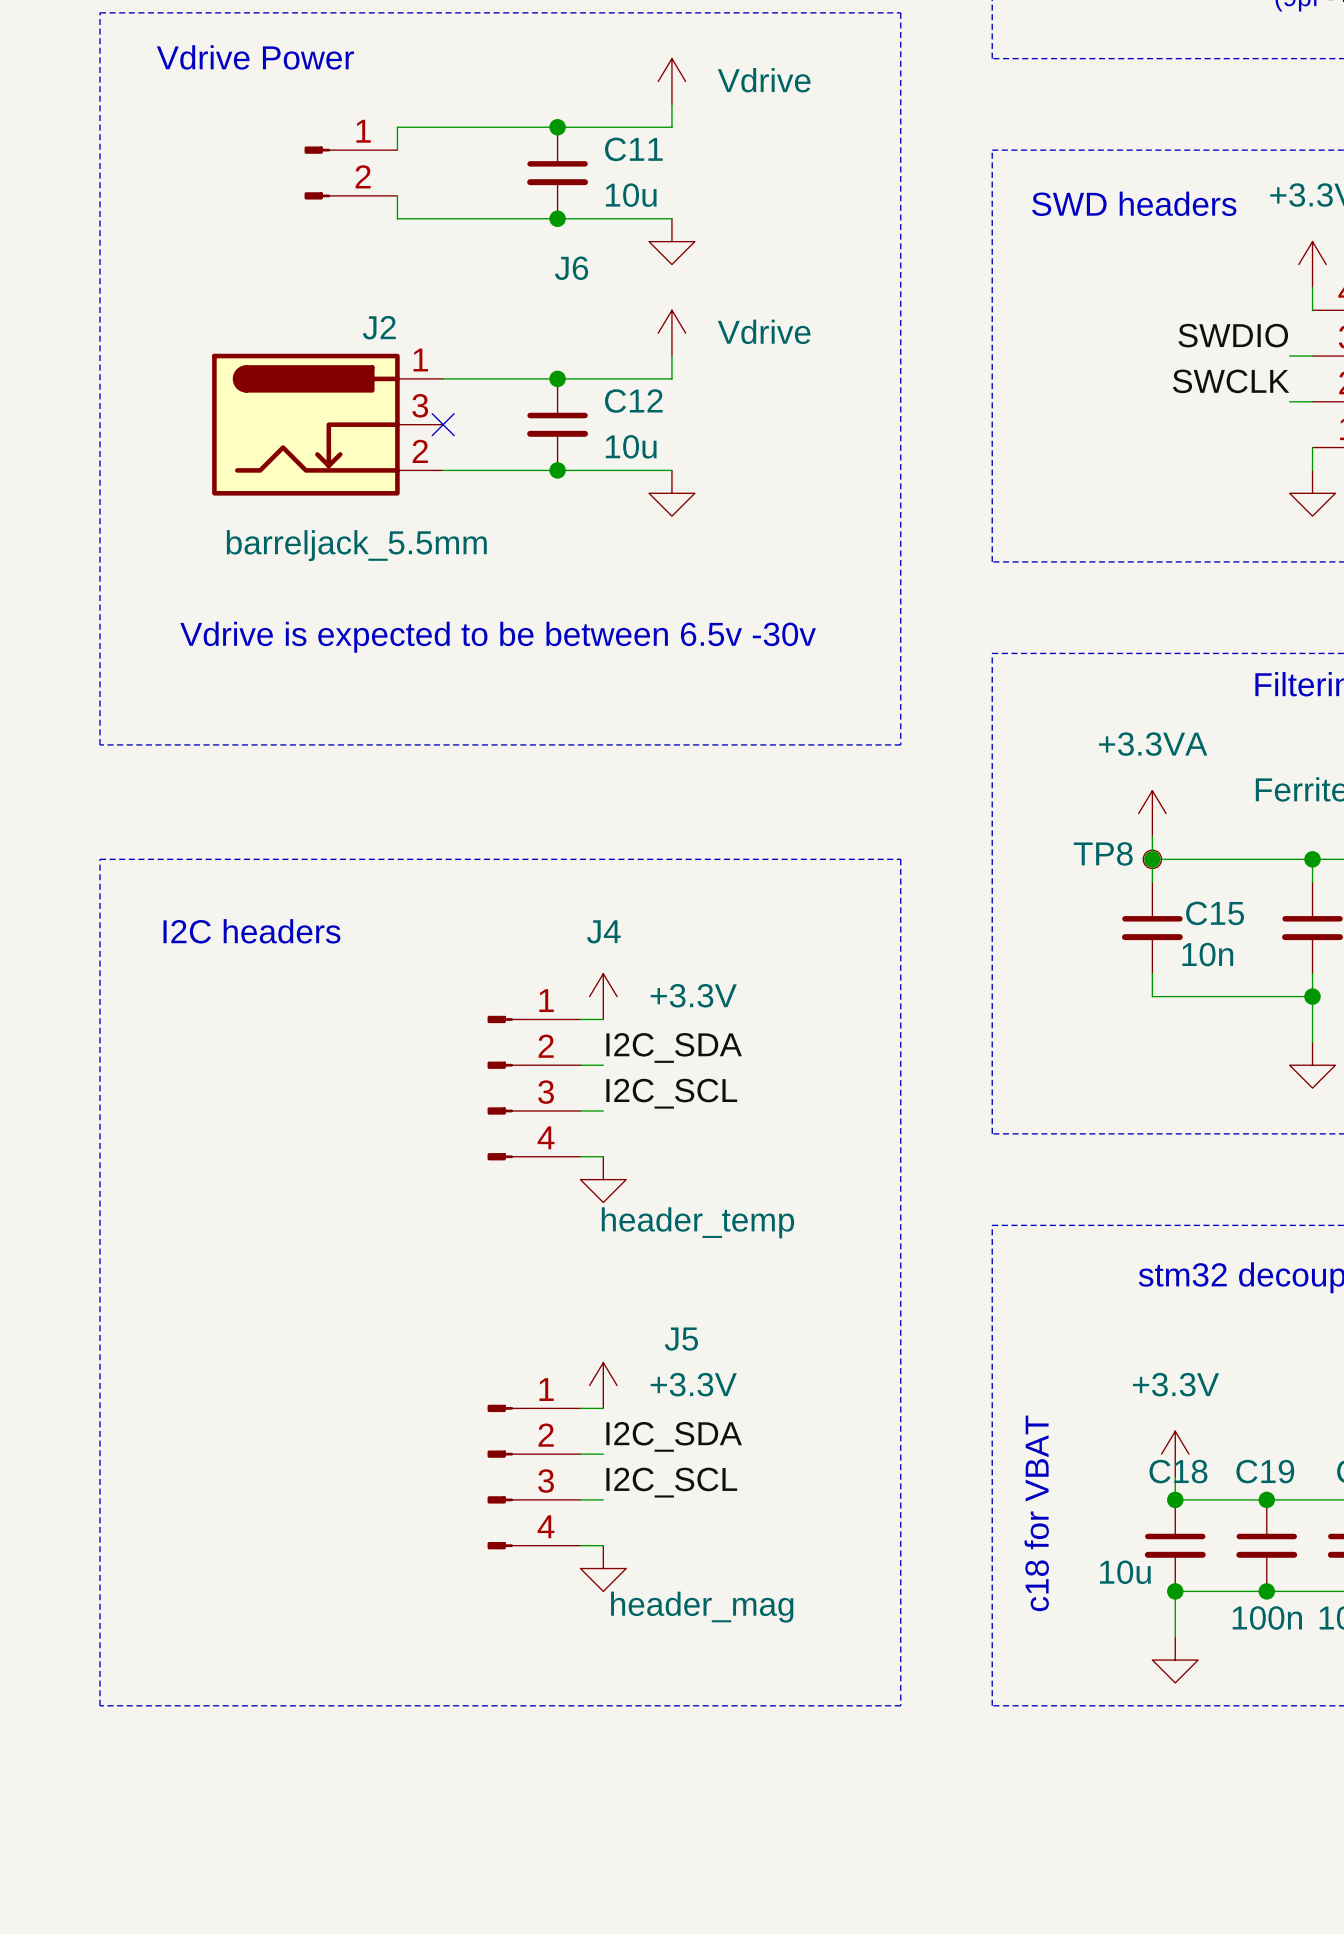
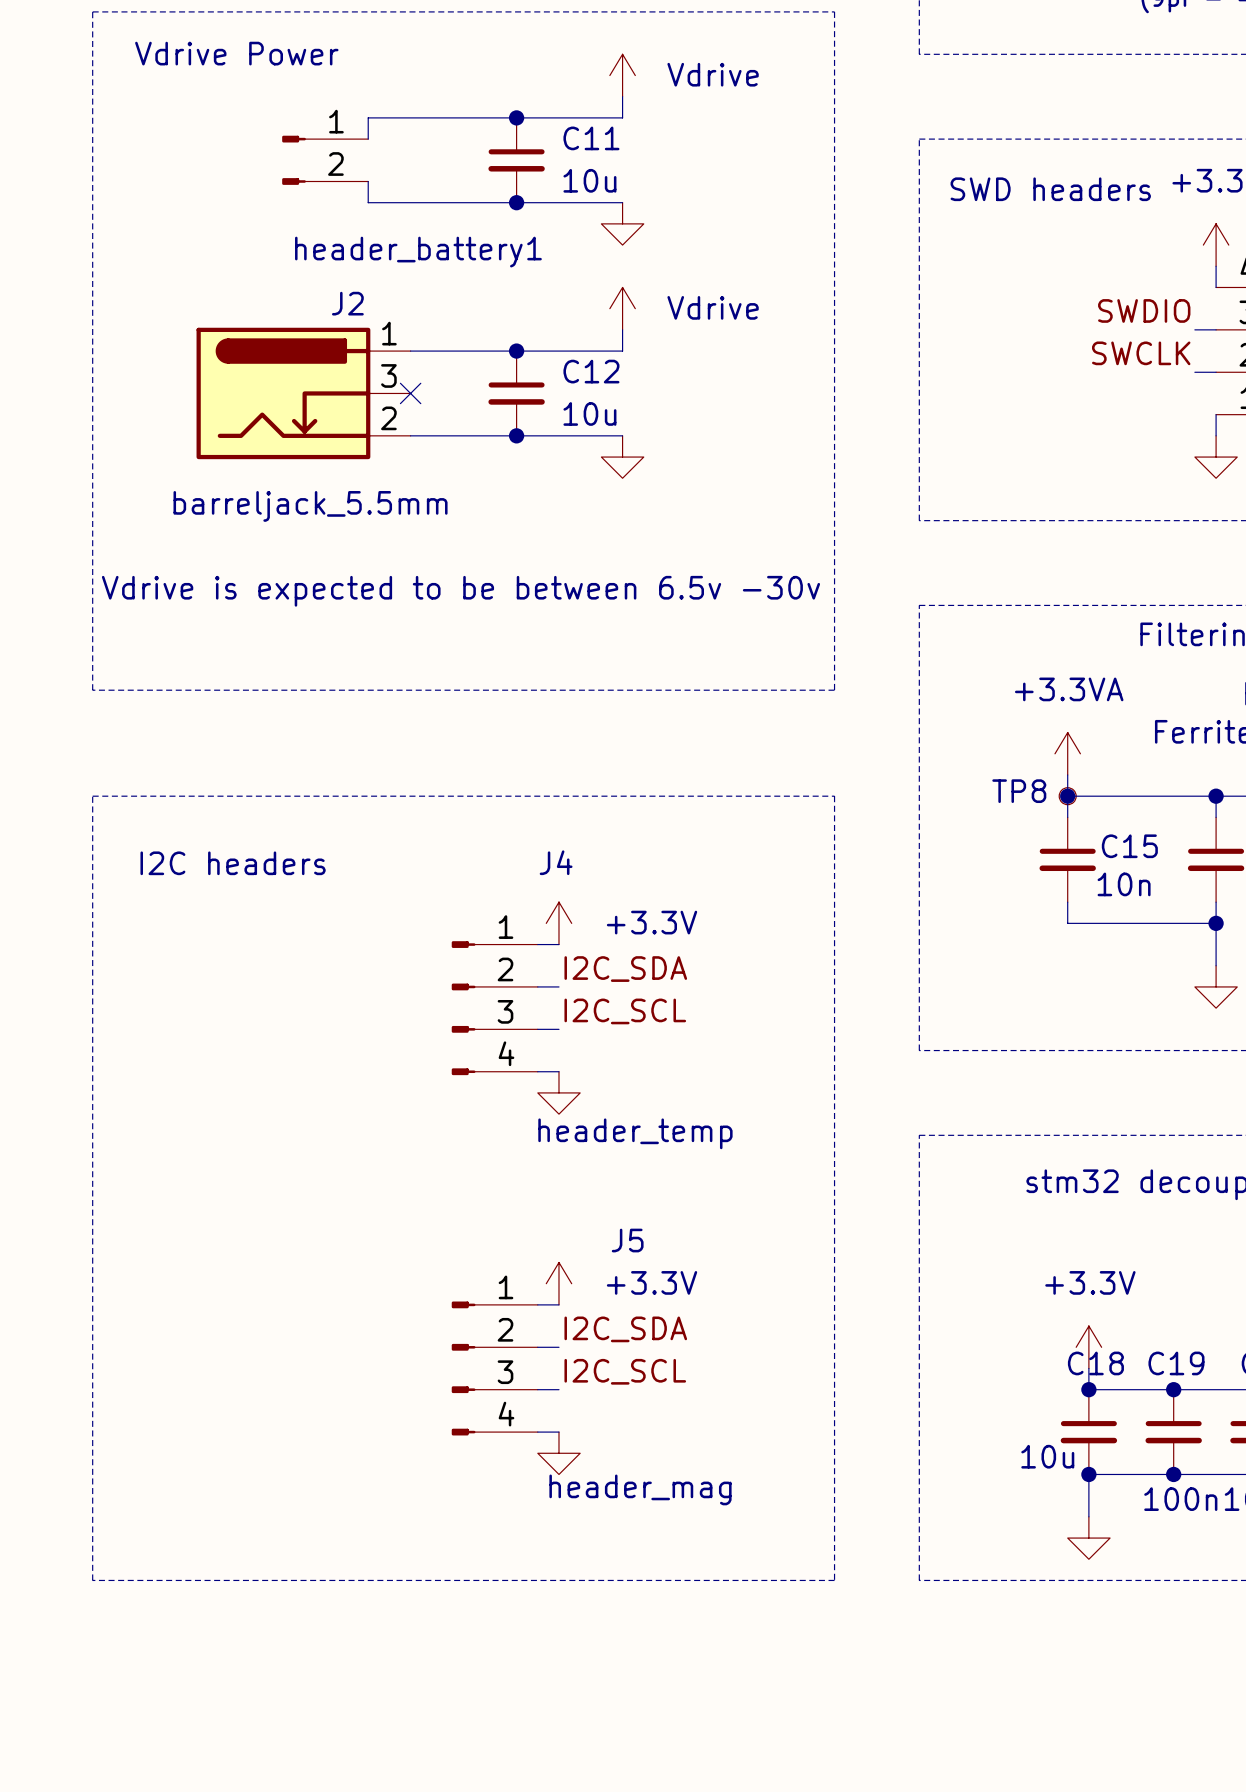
J6 name: J6 (571, 268) -> header_battery1 (418, 252)
text: c18 for VBAT (1036, 1513) -> none

